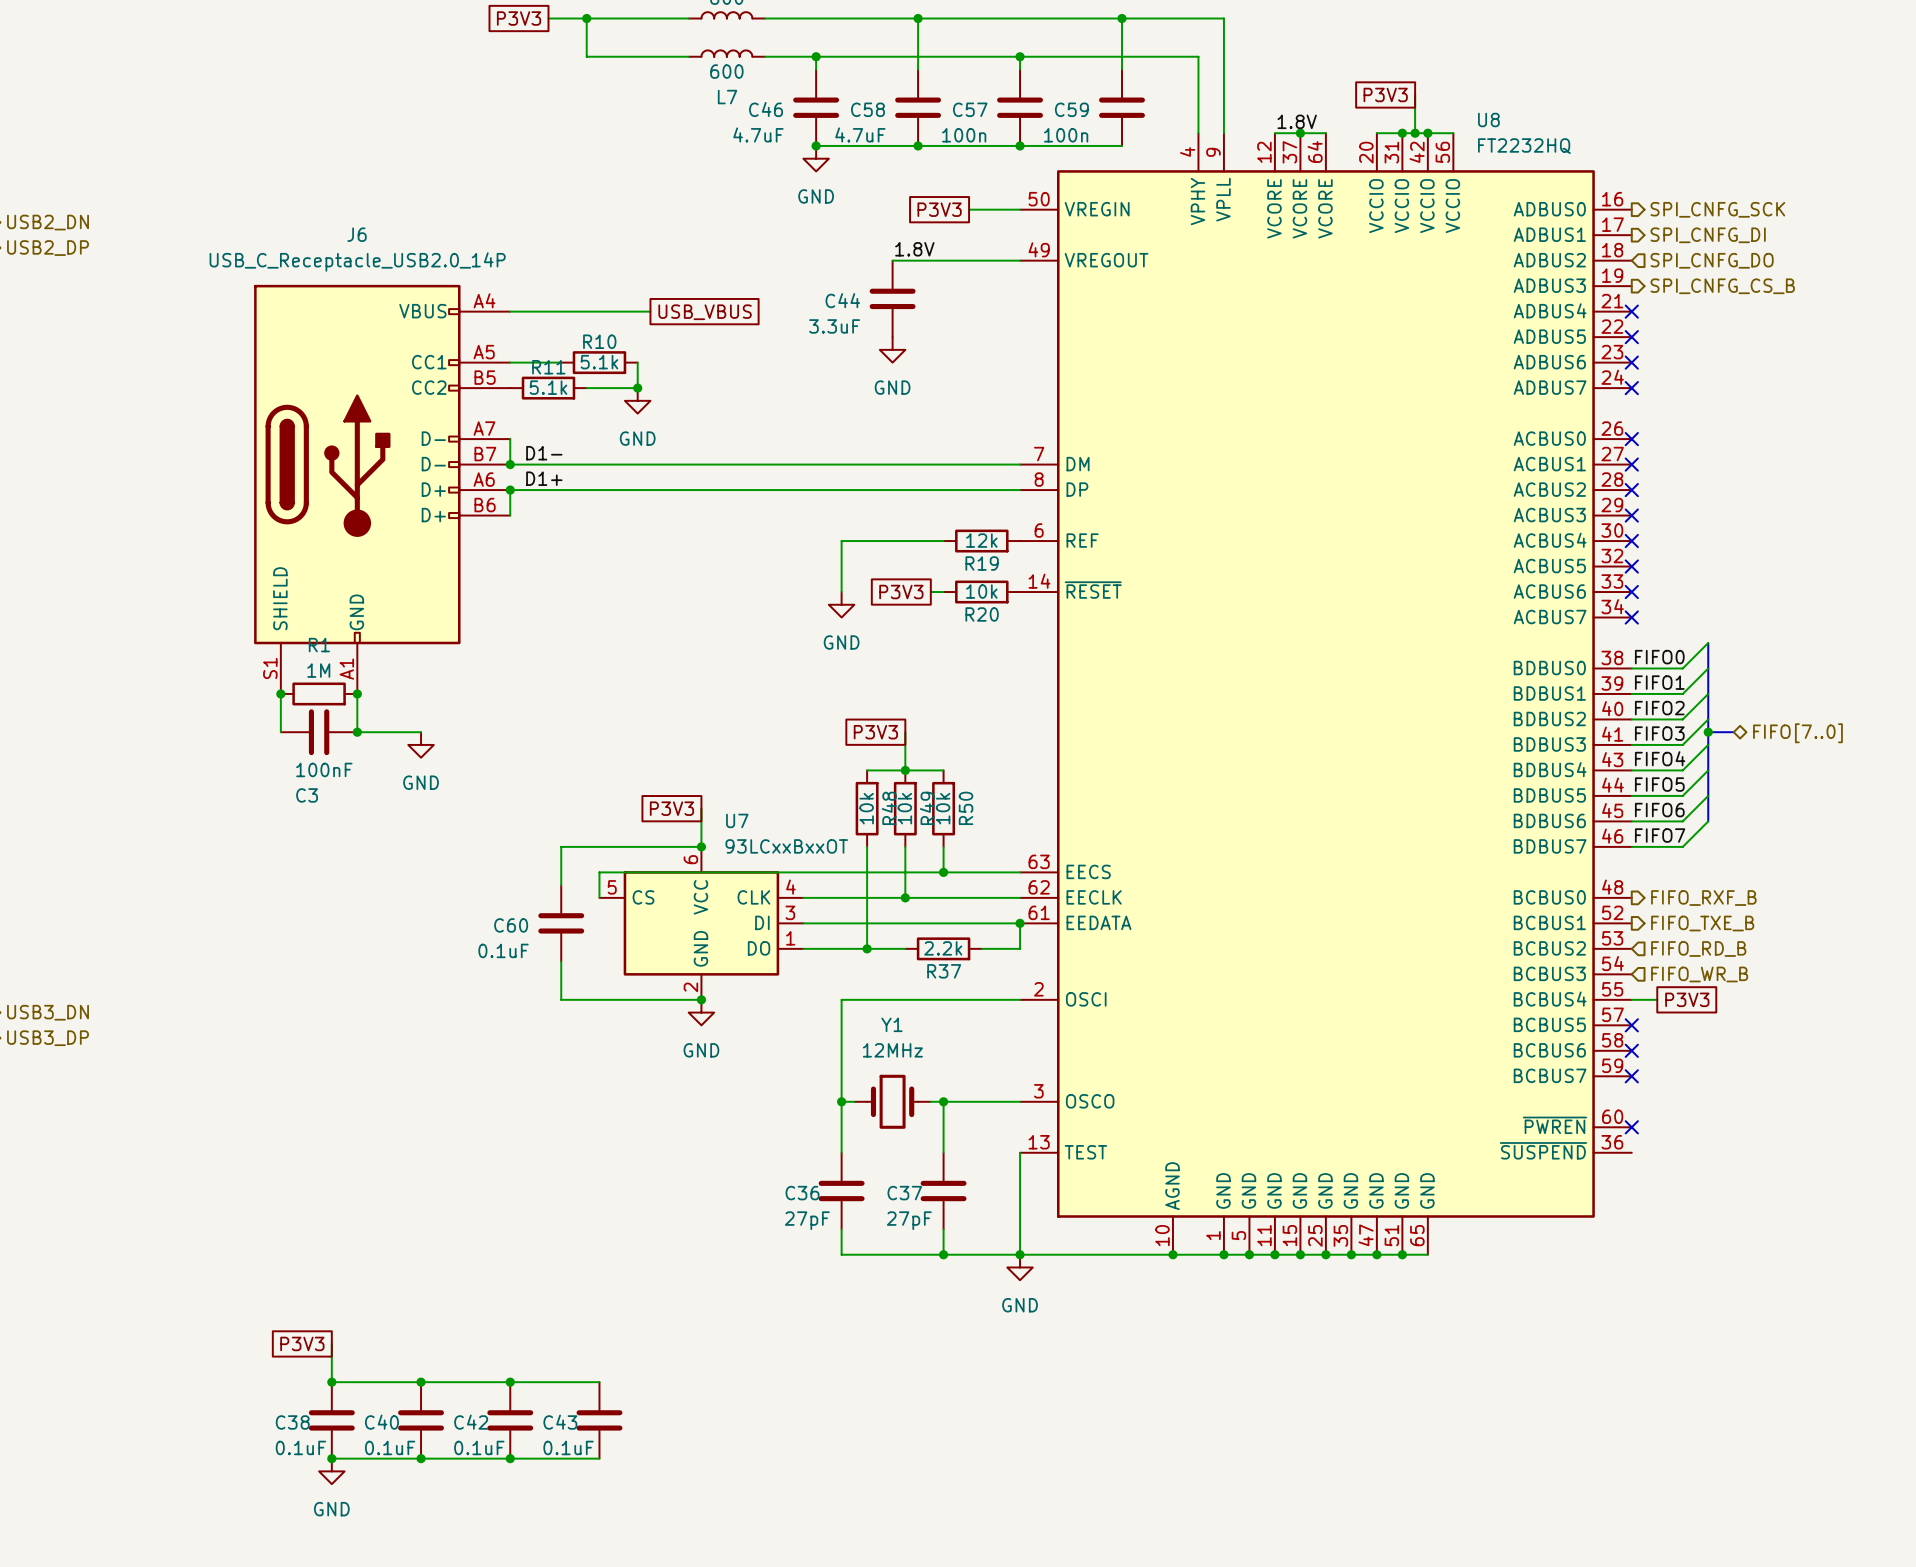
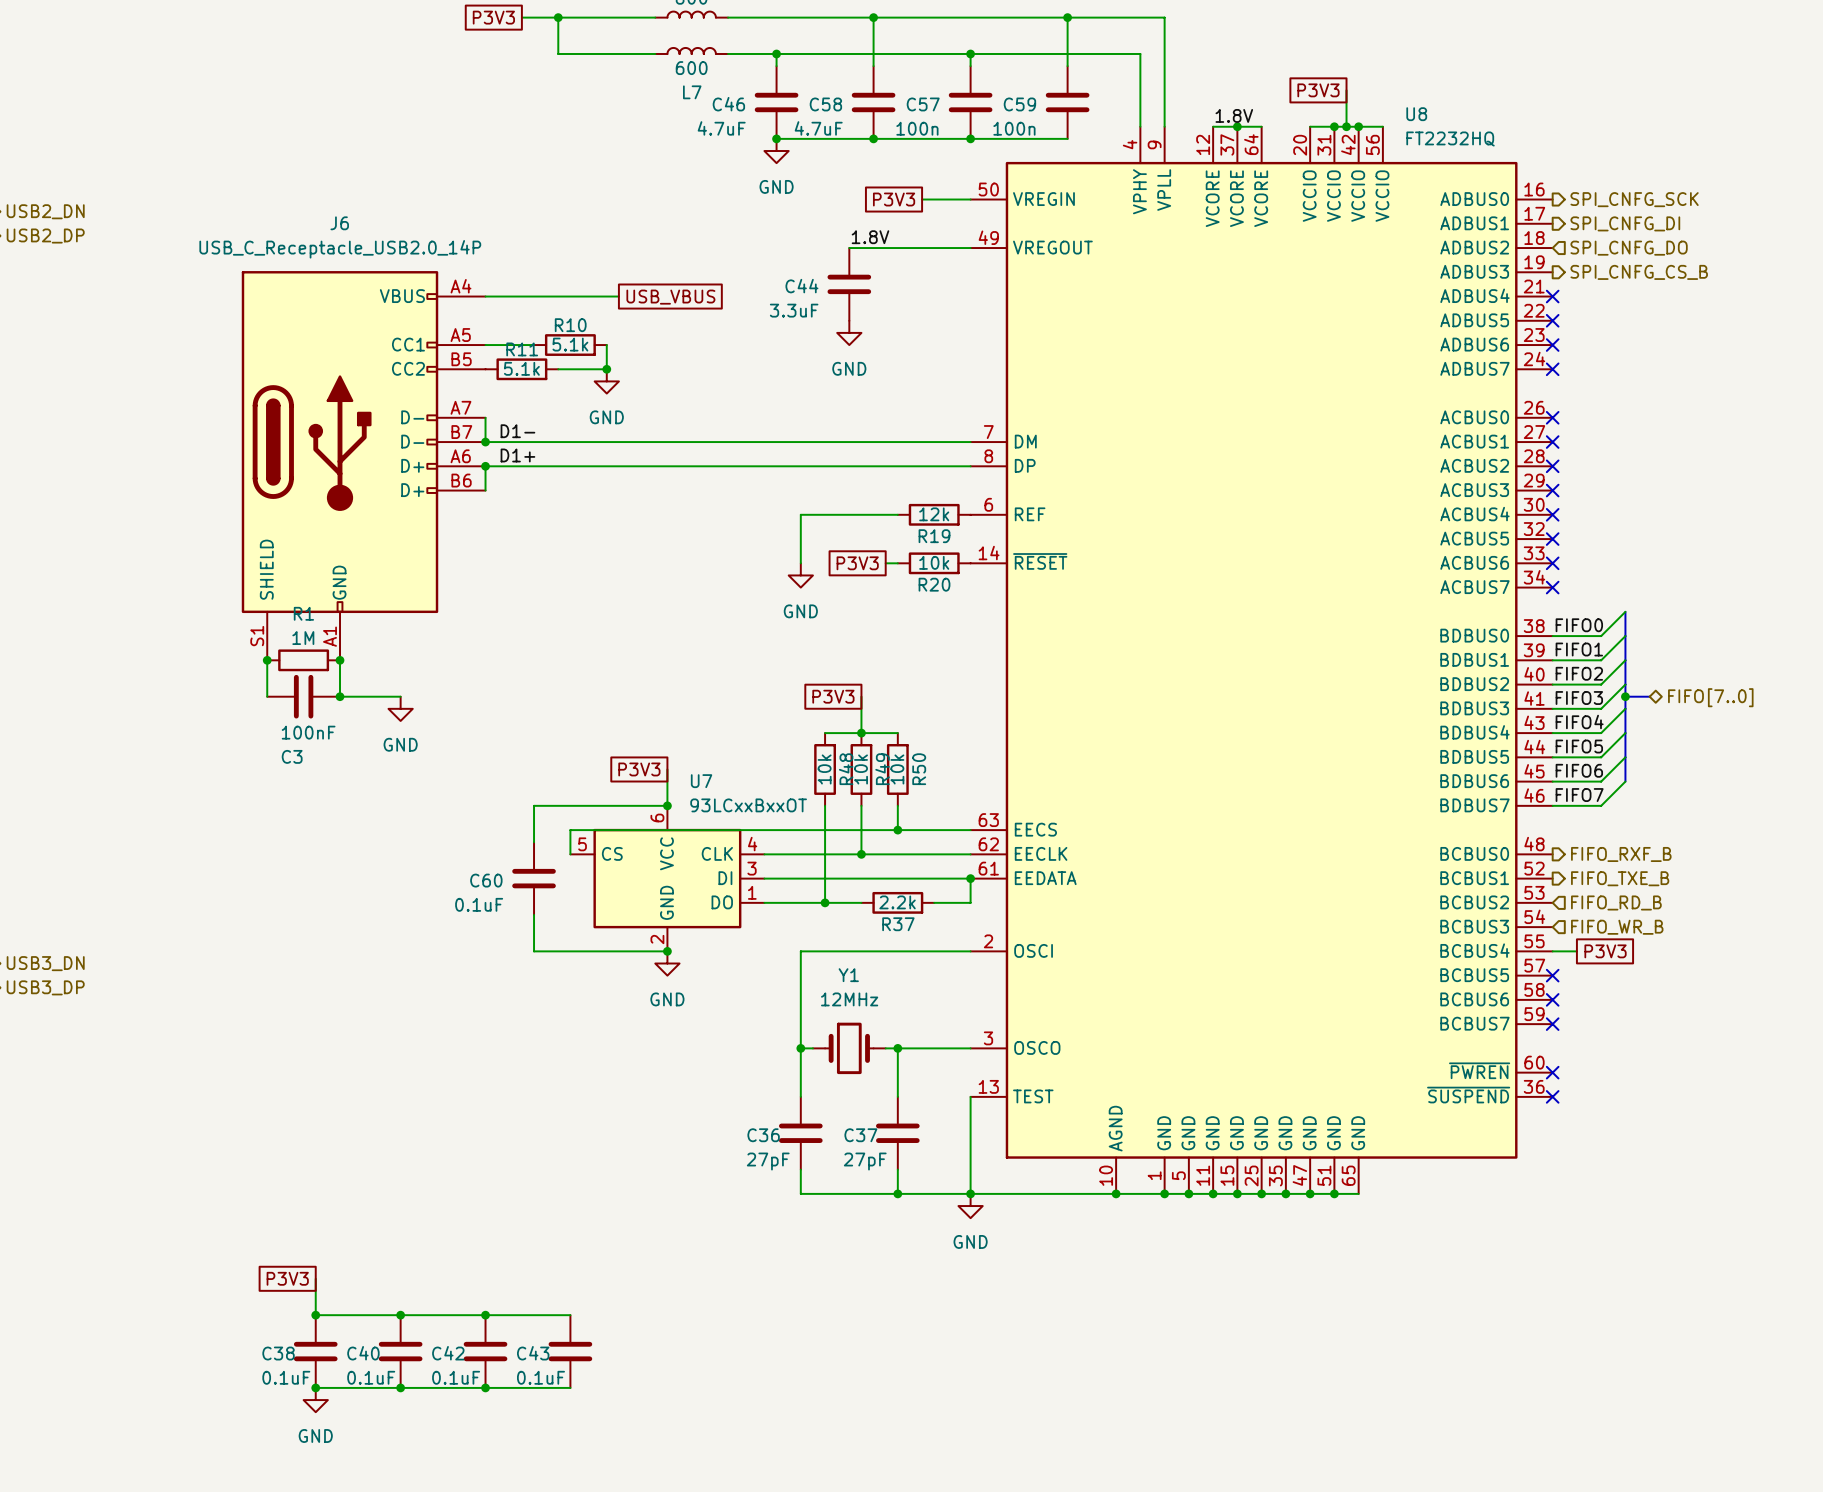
no-connect mark: none -> (1552, 1096)

